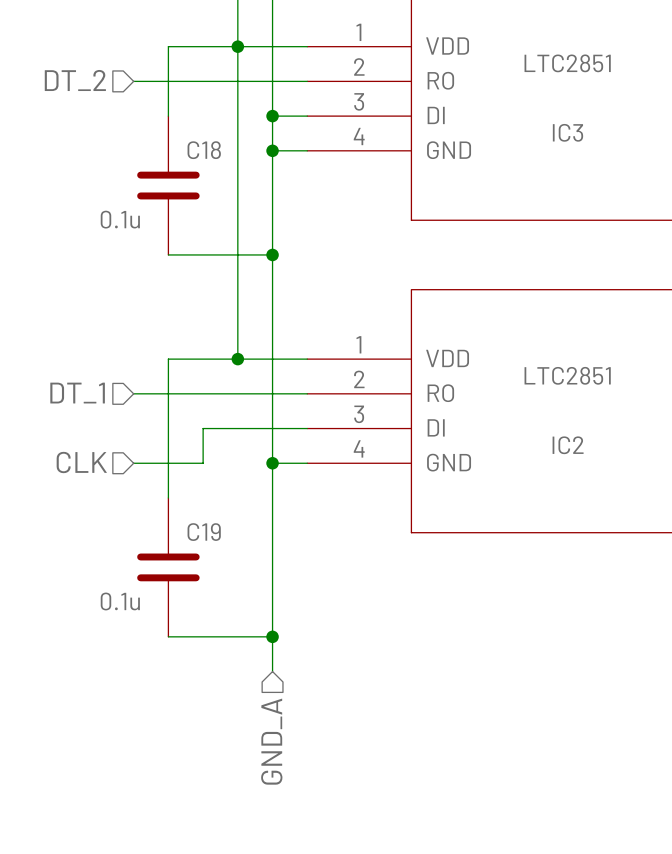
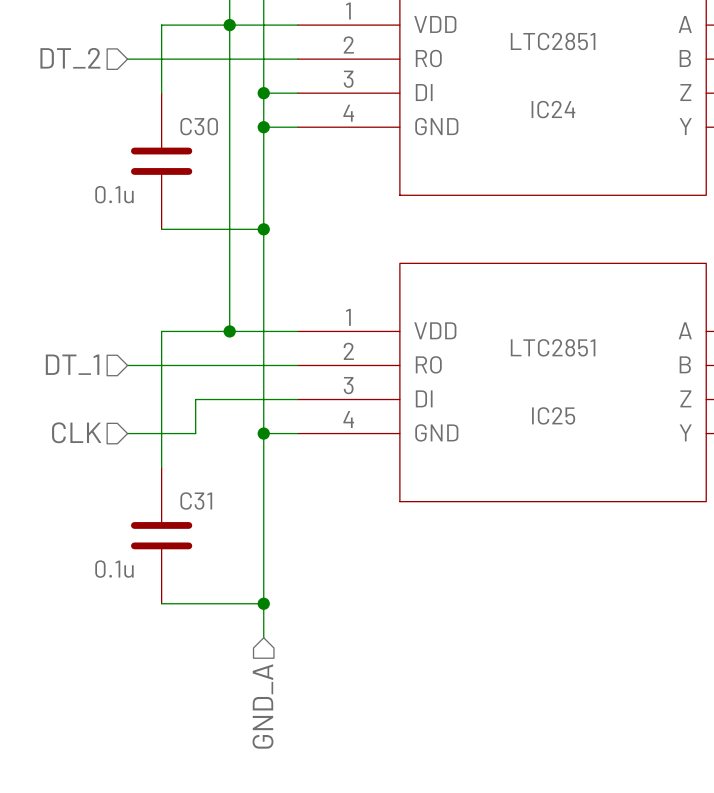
IC3 name: IC3 (568, 132) -> IC24 (553, 109)
C18 name: C18 (204, 150) -> C30 (199, 126)
IC2 name: IC2 (568, 445) -> IC25 (553, 415)
C19 name: C19 (204, 532) -> C31 (196, 501)

